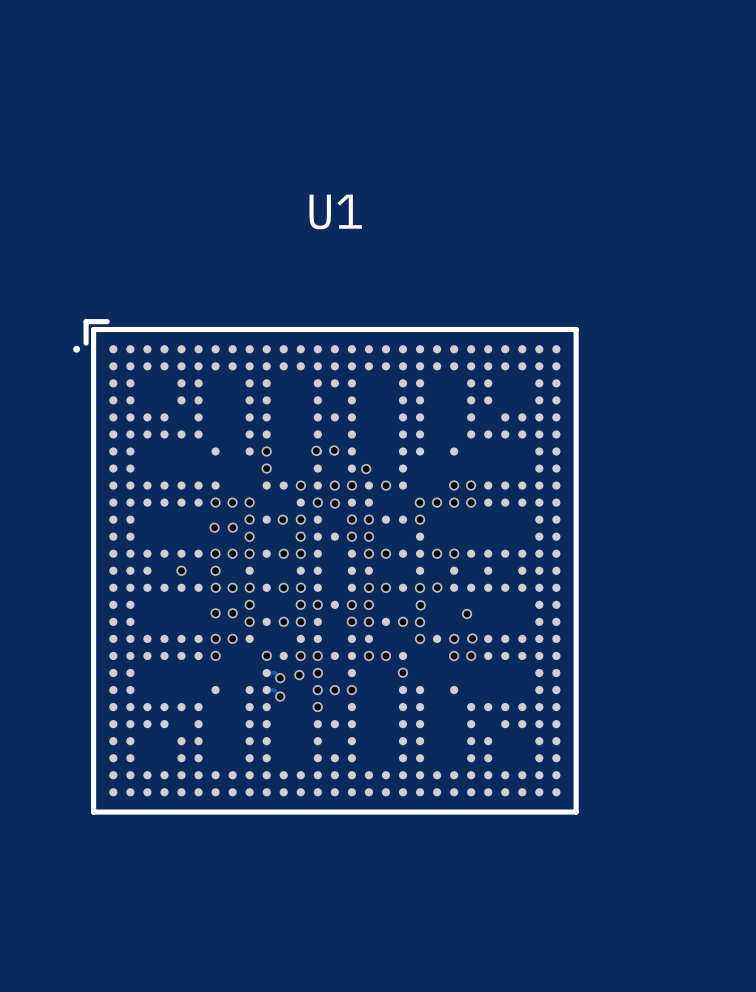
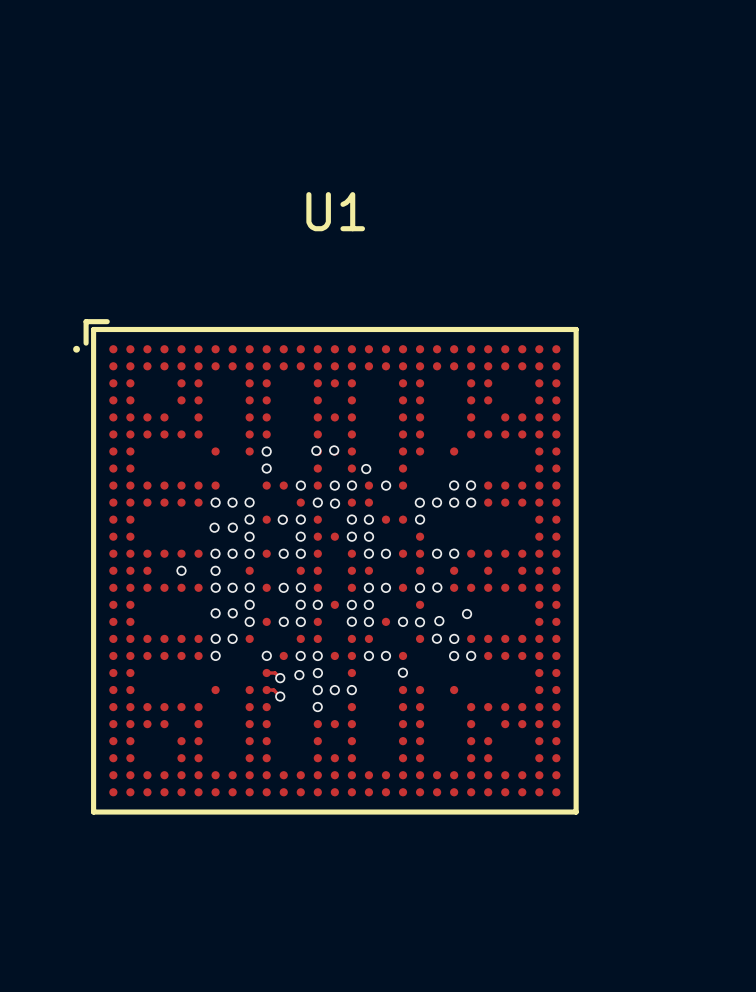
via: (420, 605) -> none
via: none -> (439, 621)
via: (420, 638) -> none
via: none -> (436, 638)
via: (472, 638) -> none

